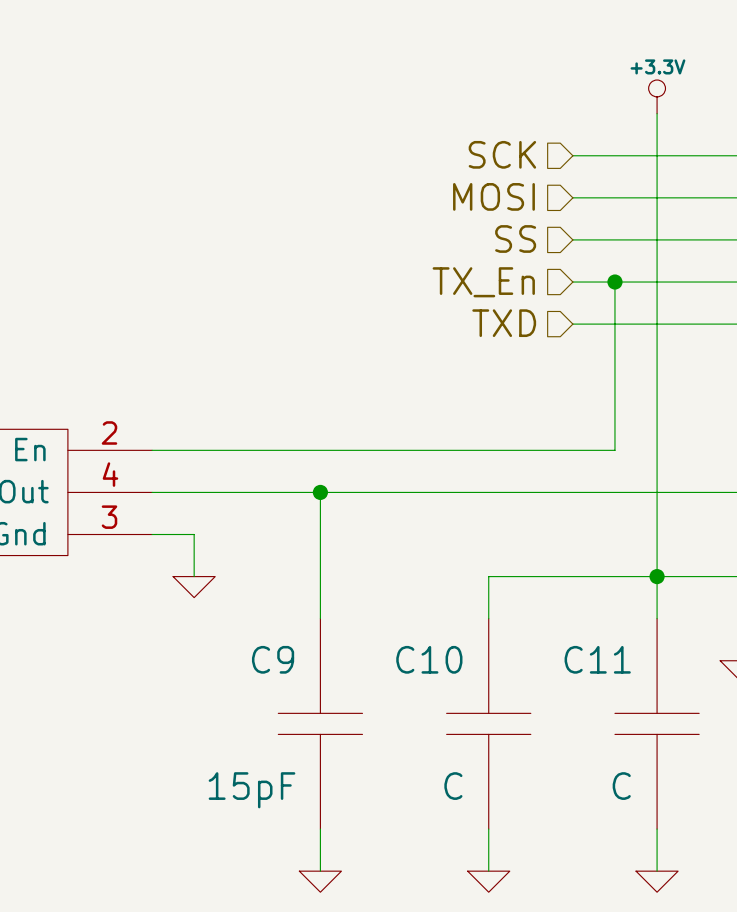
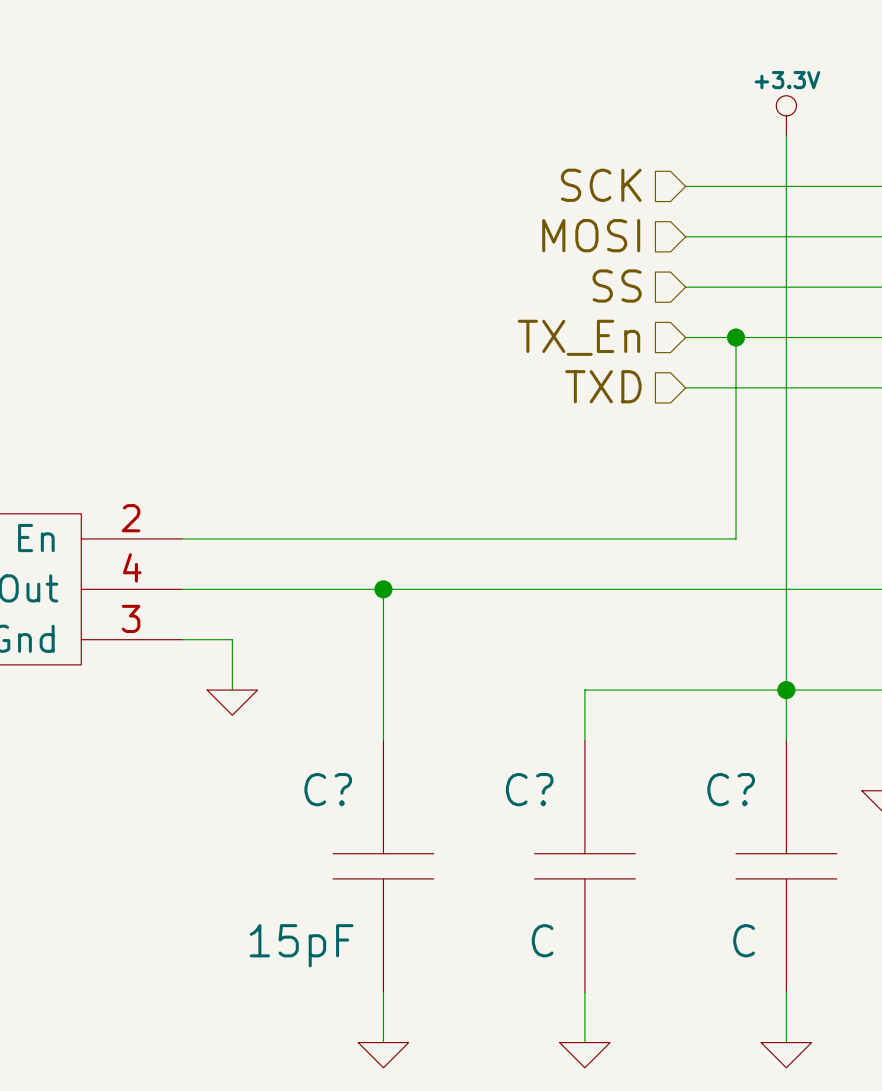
C9 name: C9 (273, 659) -> C? (328, 789)
C10 name: C10 (429, 659) -> C? (529, 789)
C11 name: C11 (597, 659) -> C? (731, 789)

